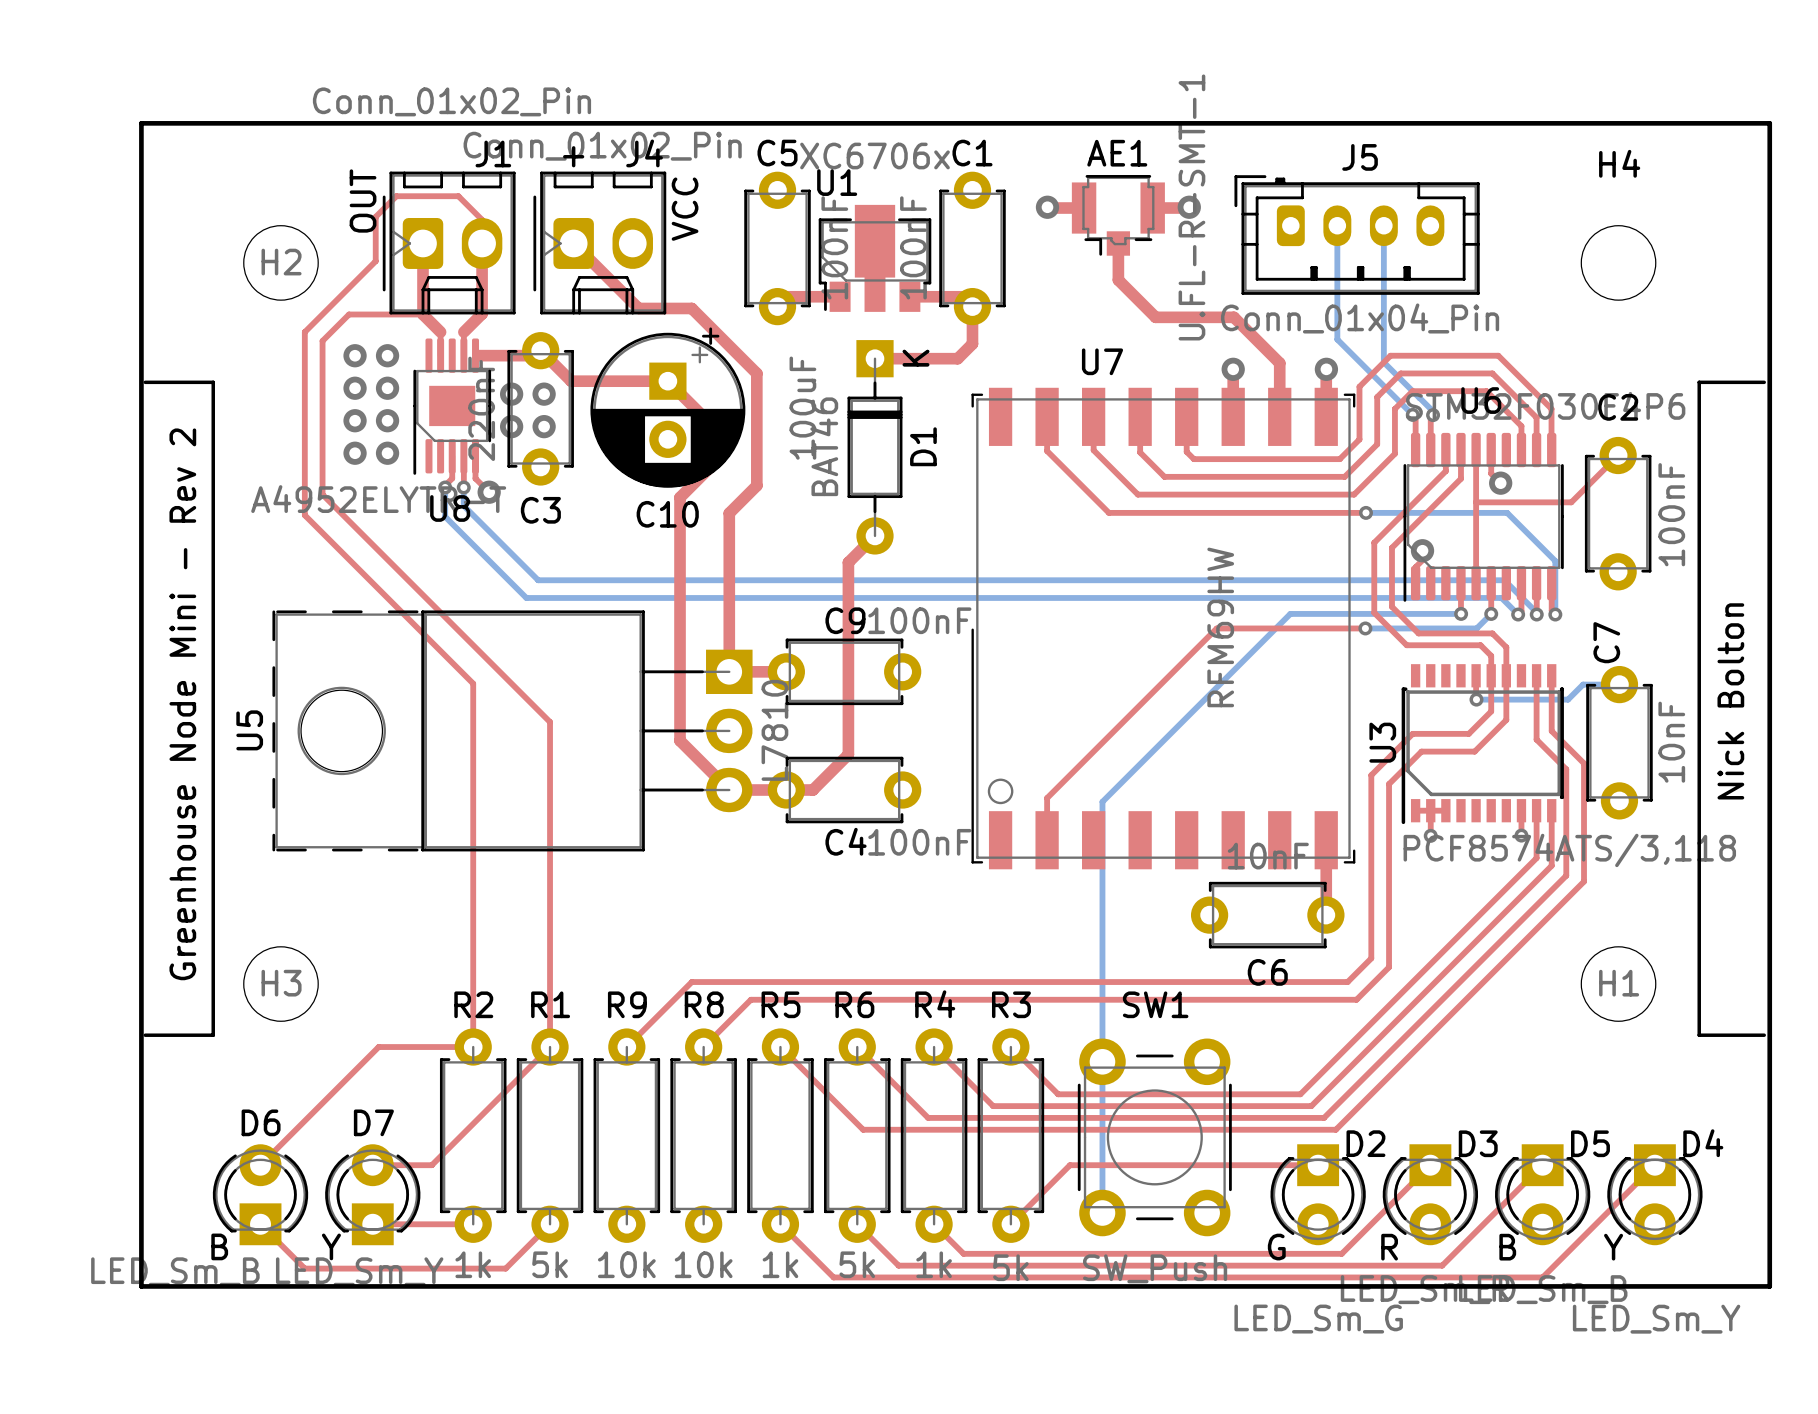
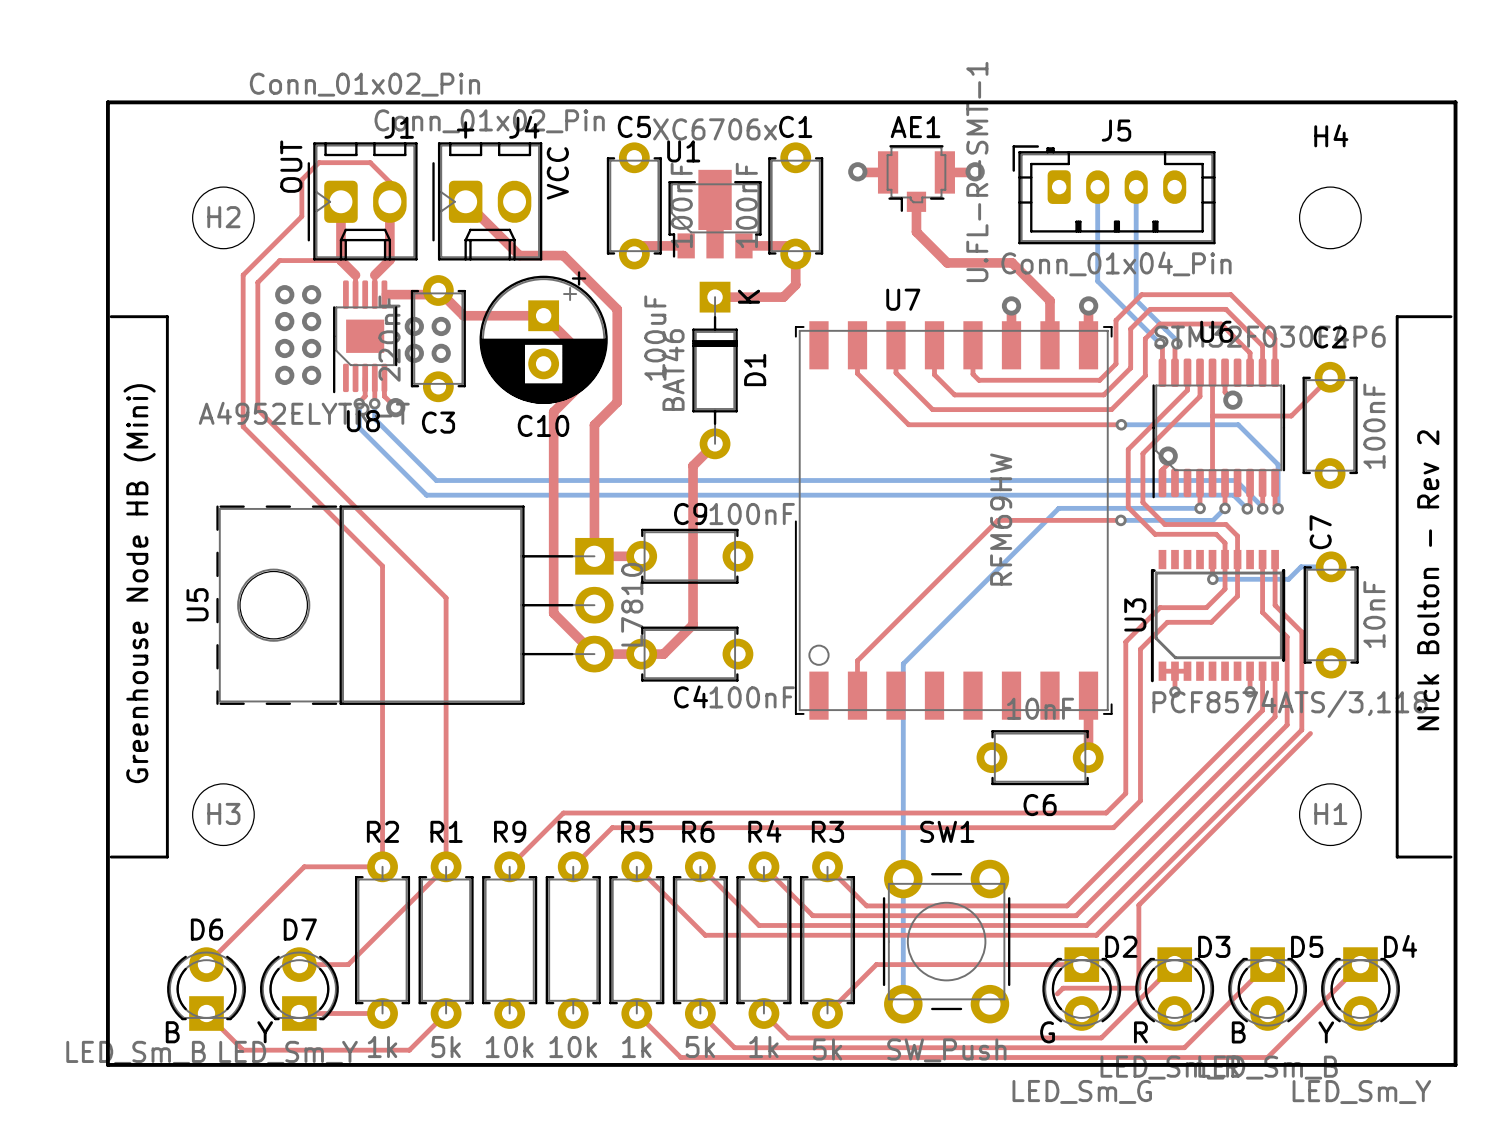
text: Nick Bolton (1730, 701) -> Nick Bolton - Rev 2 (1428, 580)
text: Greenhouse Node Mini - Rev 2 (182, 704) -> Greenhouse Node HB (Mini) (139, 583)
top track: none -> (1310, 733) (1138, 905) (1138, 988) (1063, 988) (1057, 993)

